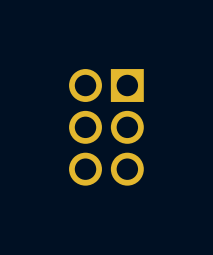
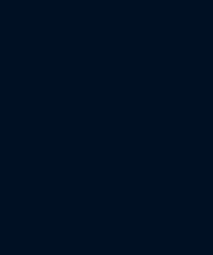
part: (106, 127) -> none

